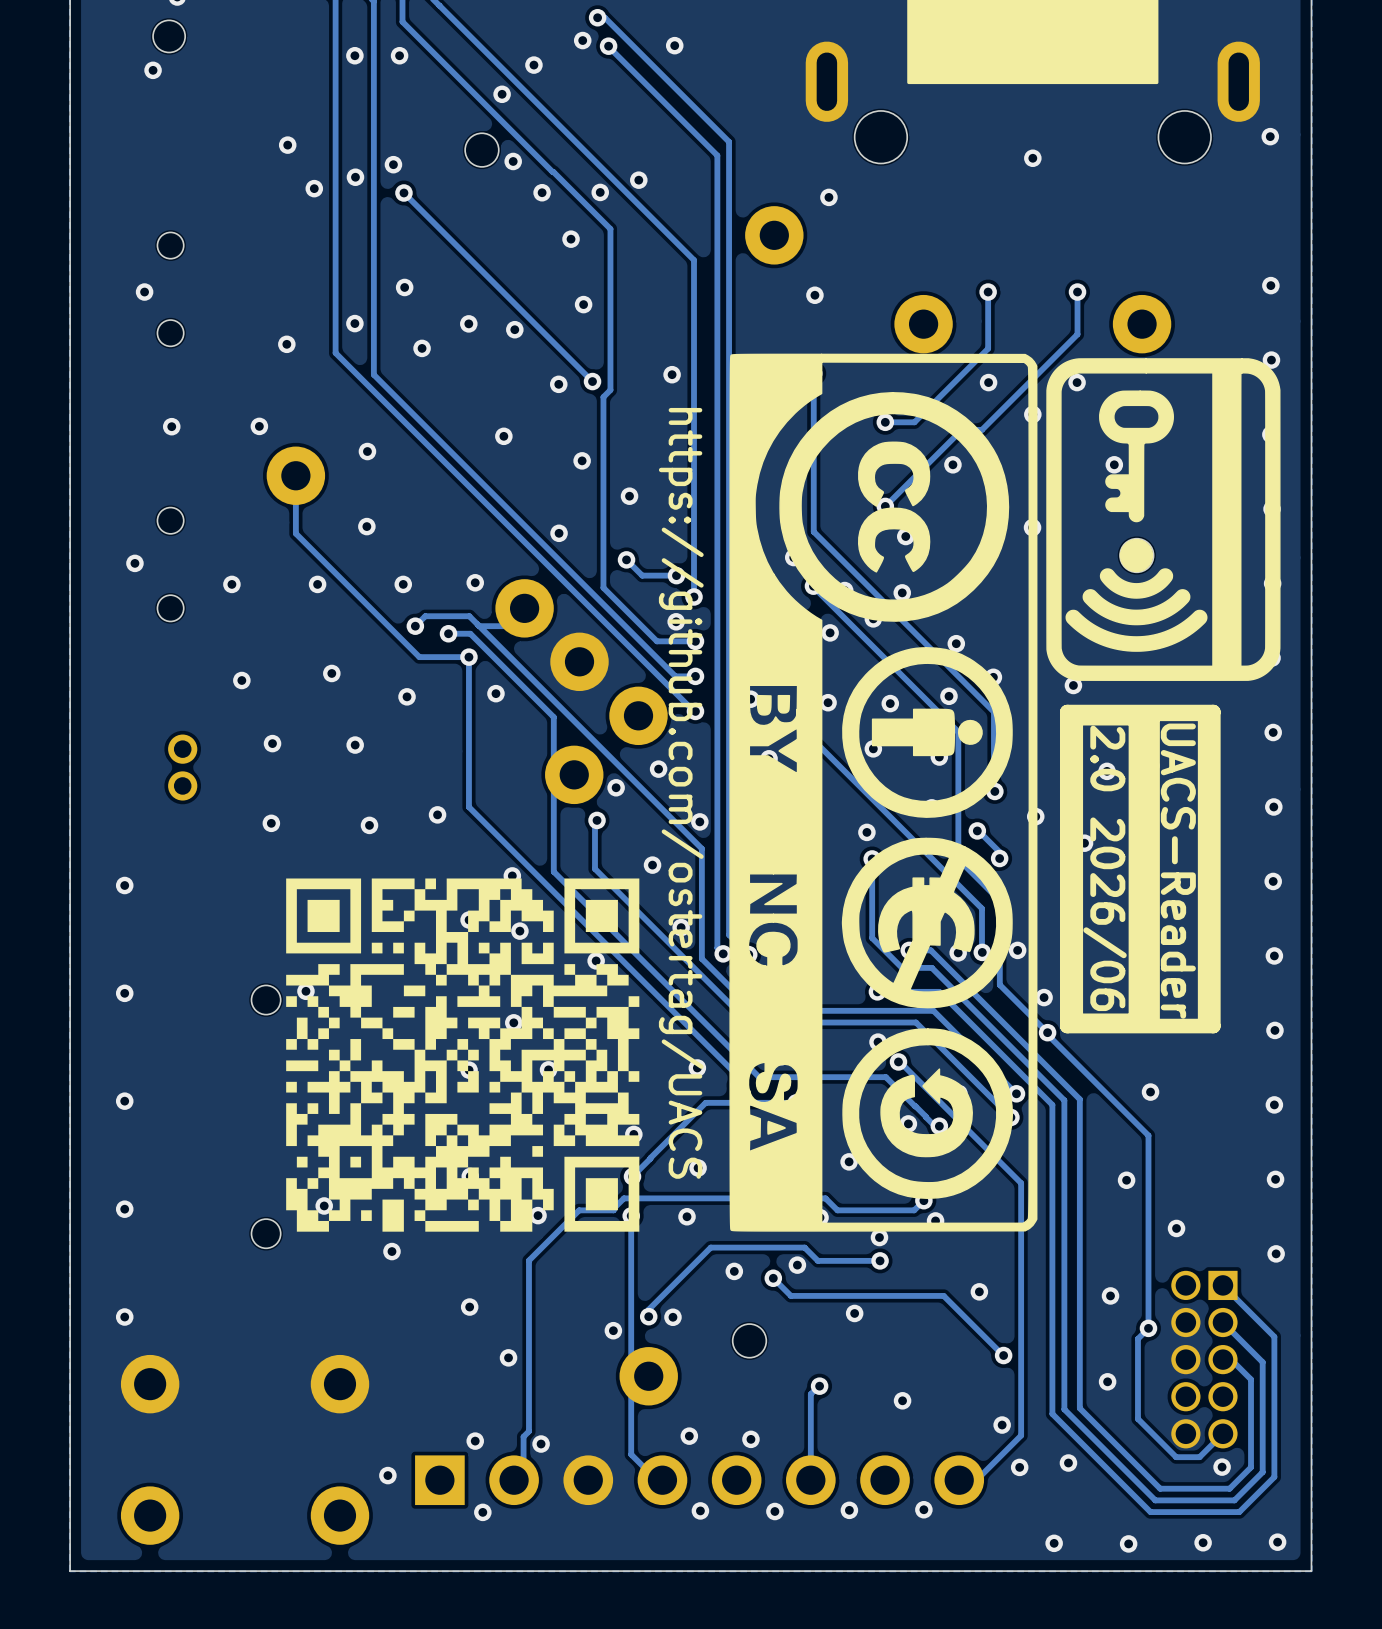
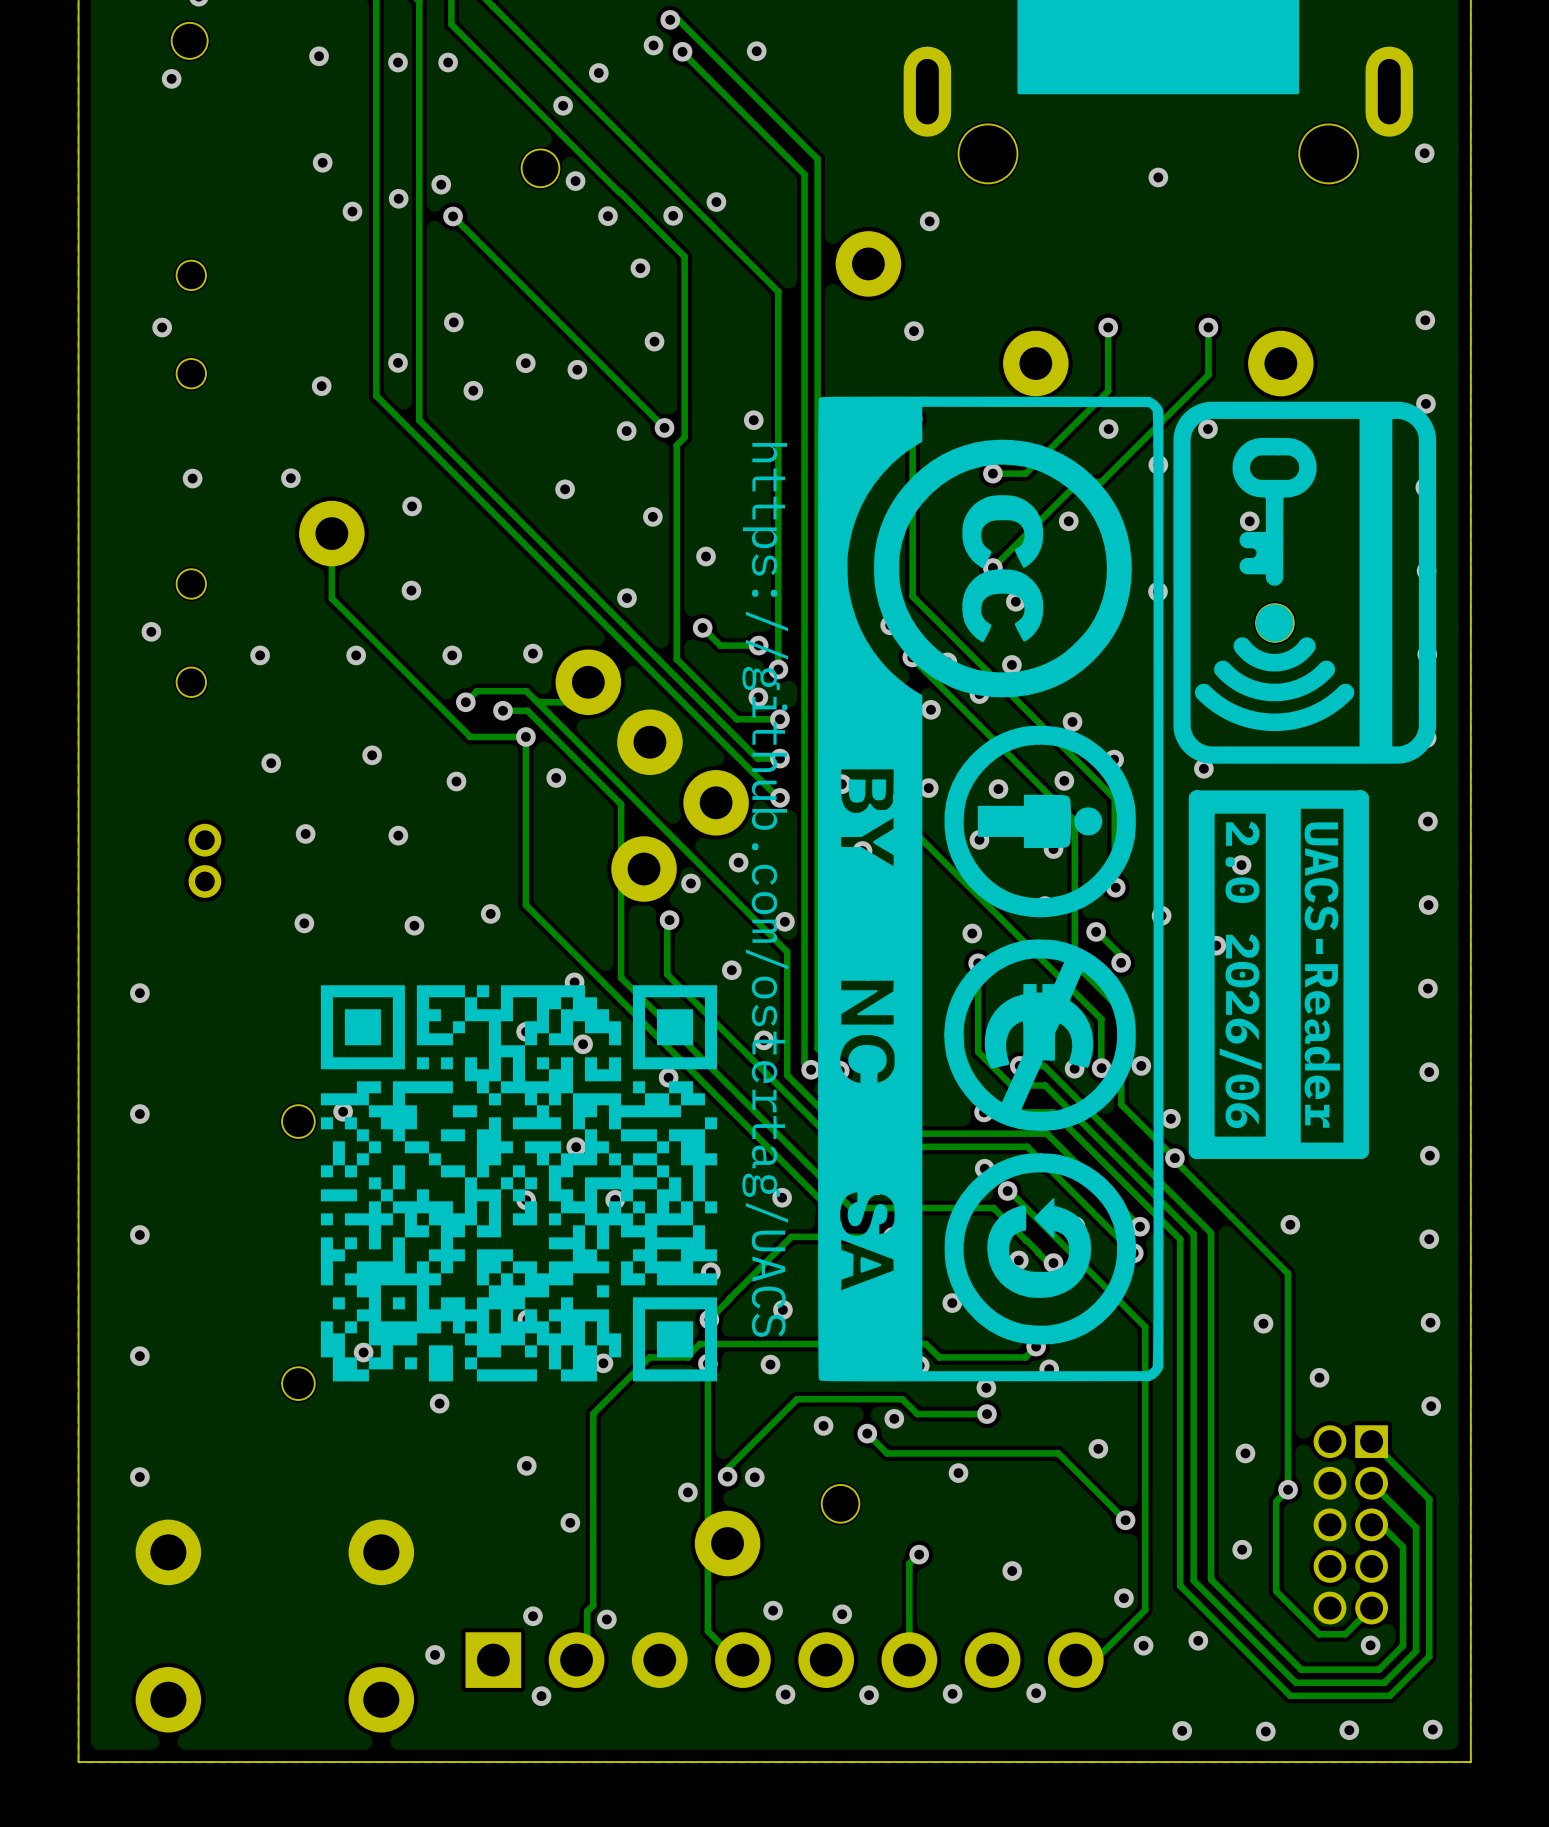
via: none -> (319, 56)

